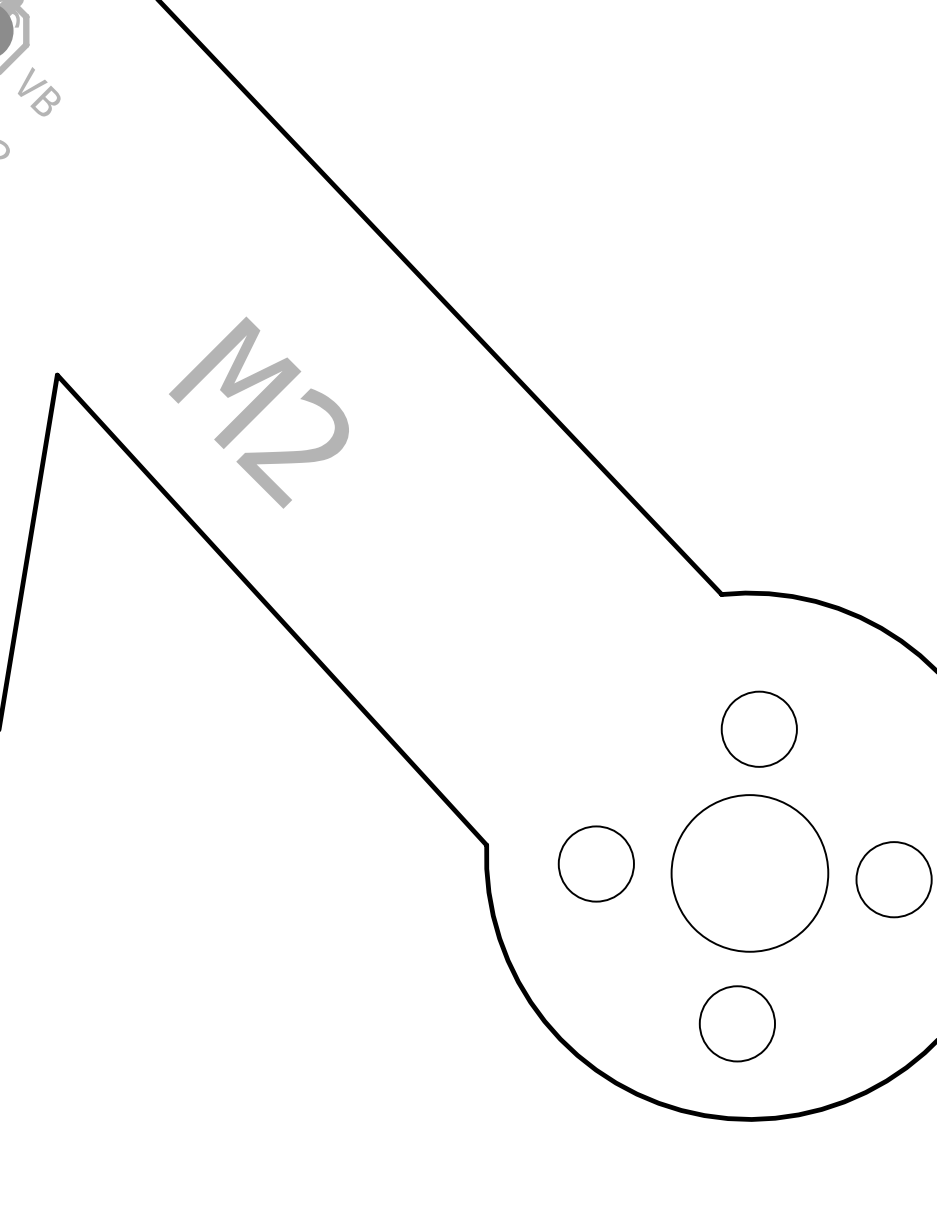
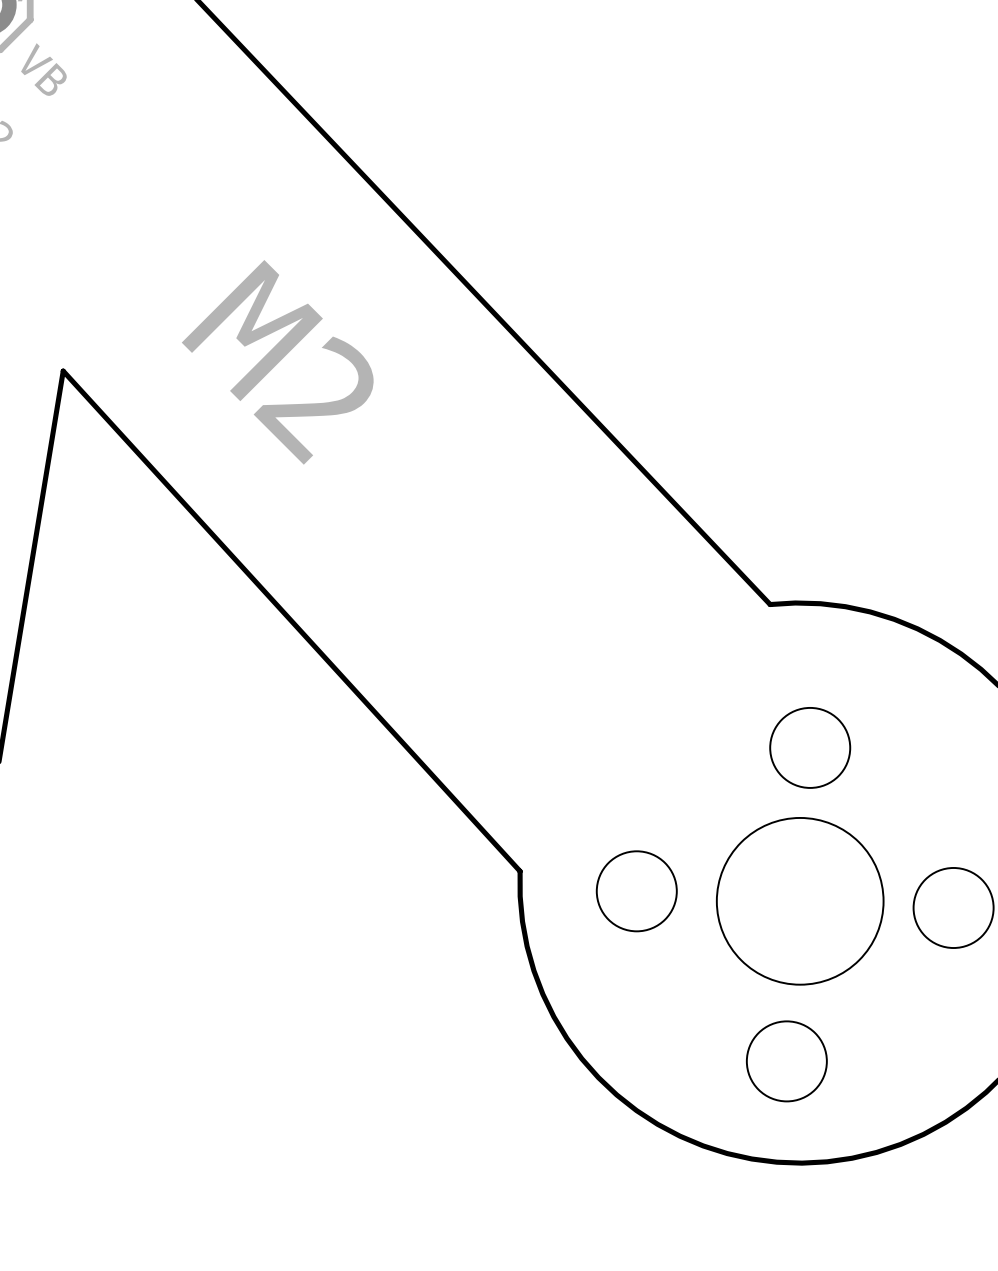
text position: M2 (259, 412) -> M2 (278, 362)

